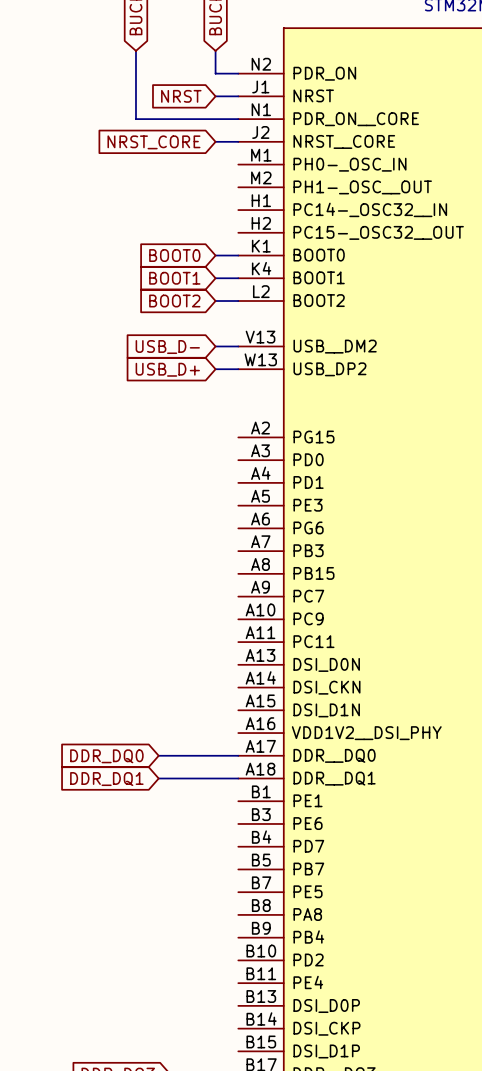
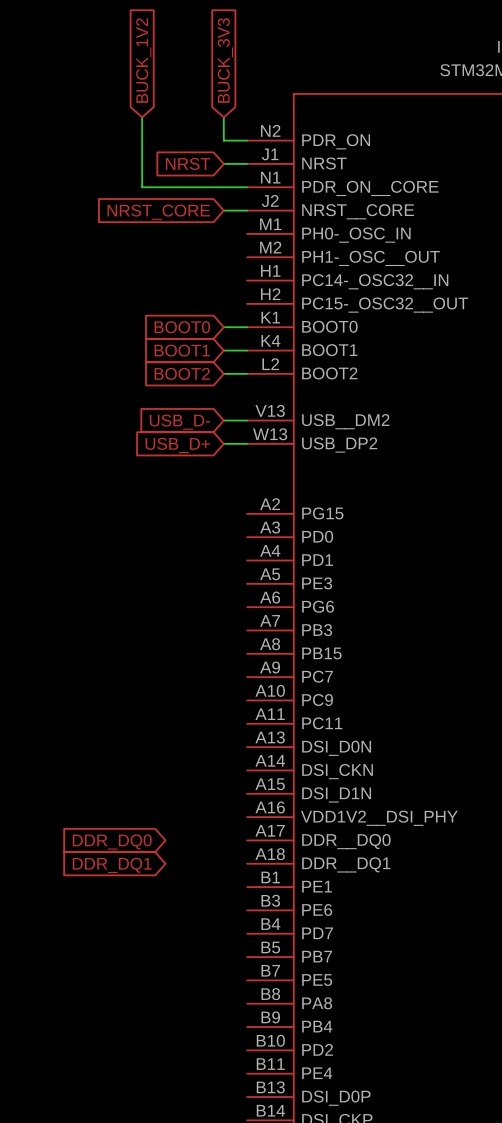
wire: (158, 755) (238, 755) -> none
wire: (158, 778) (238, 778) -> none

